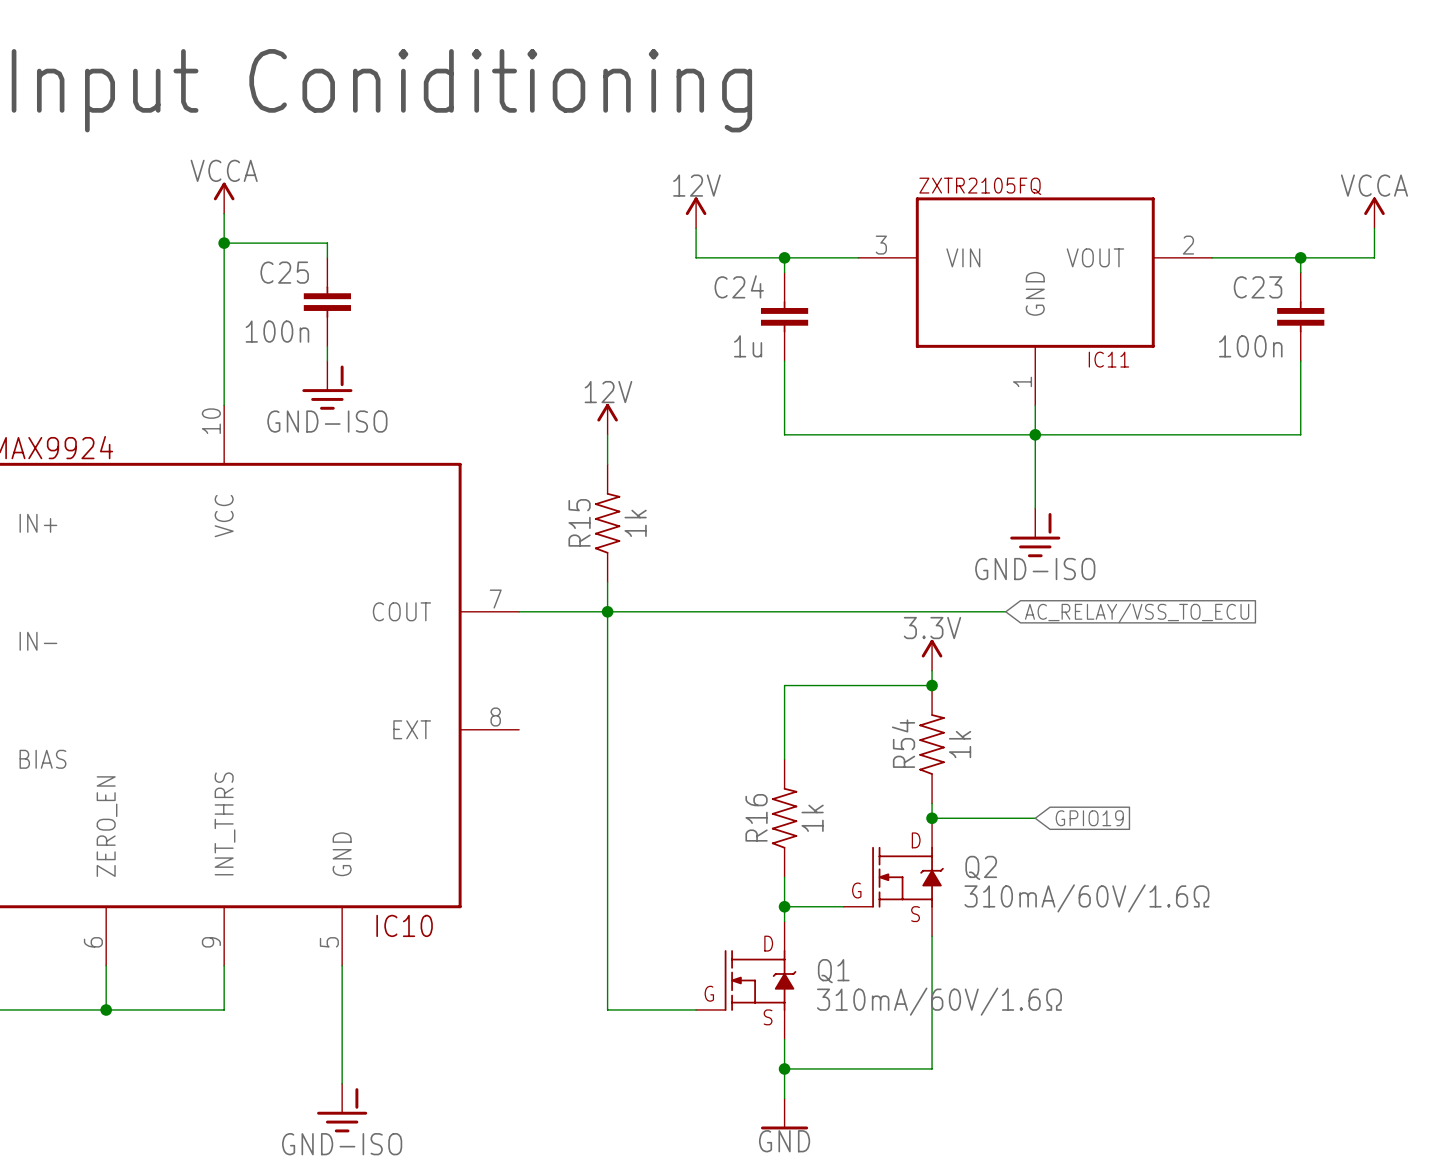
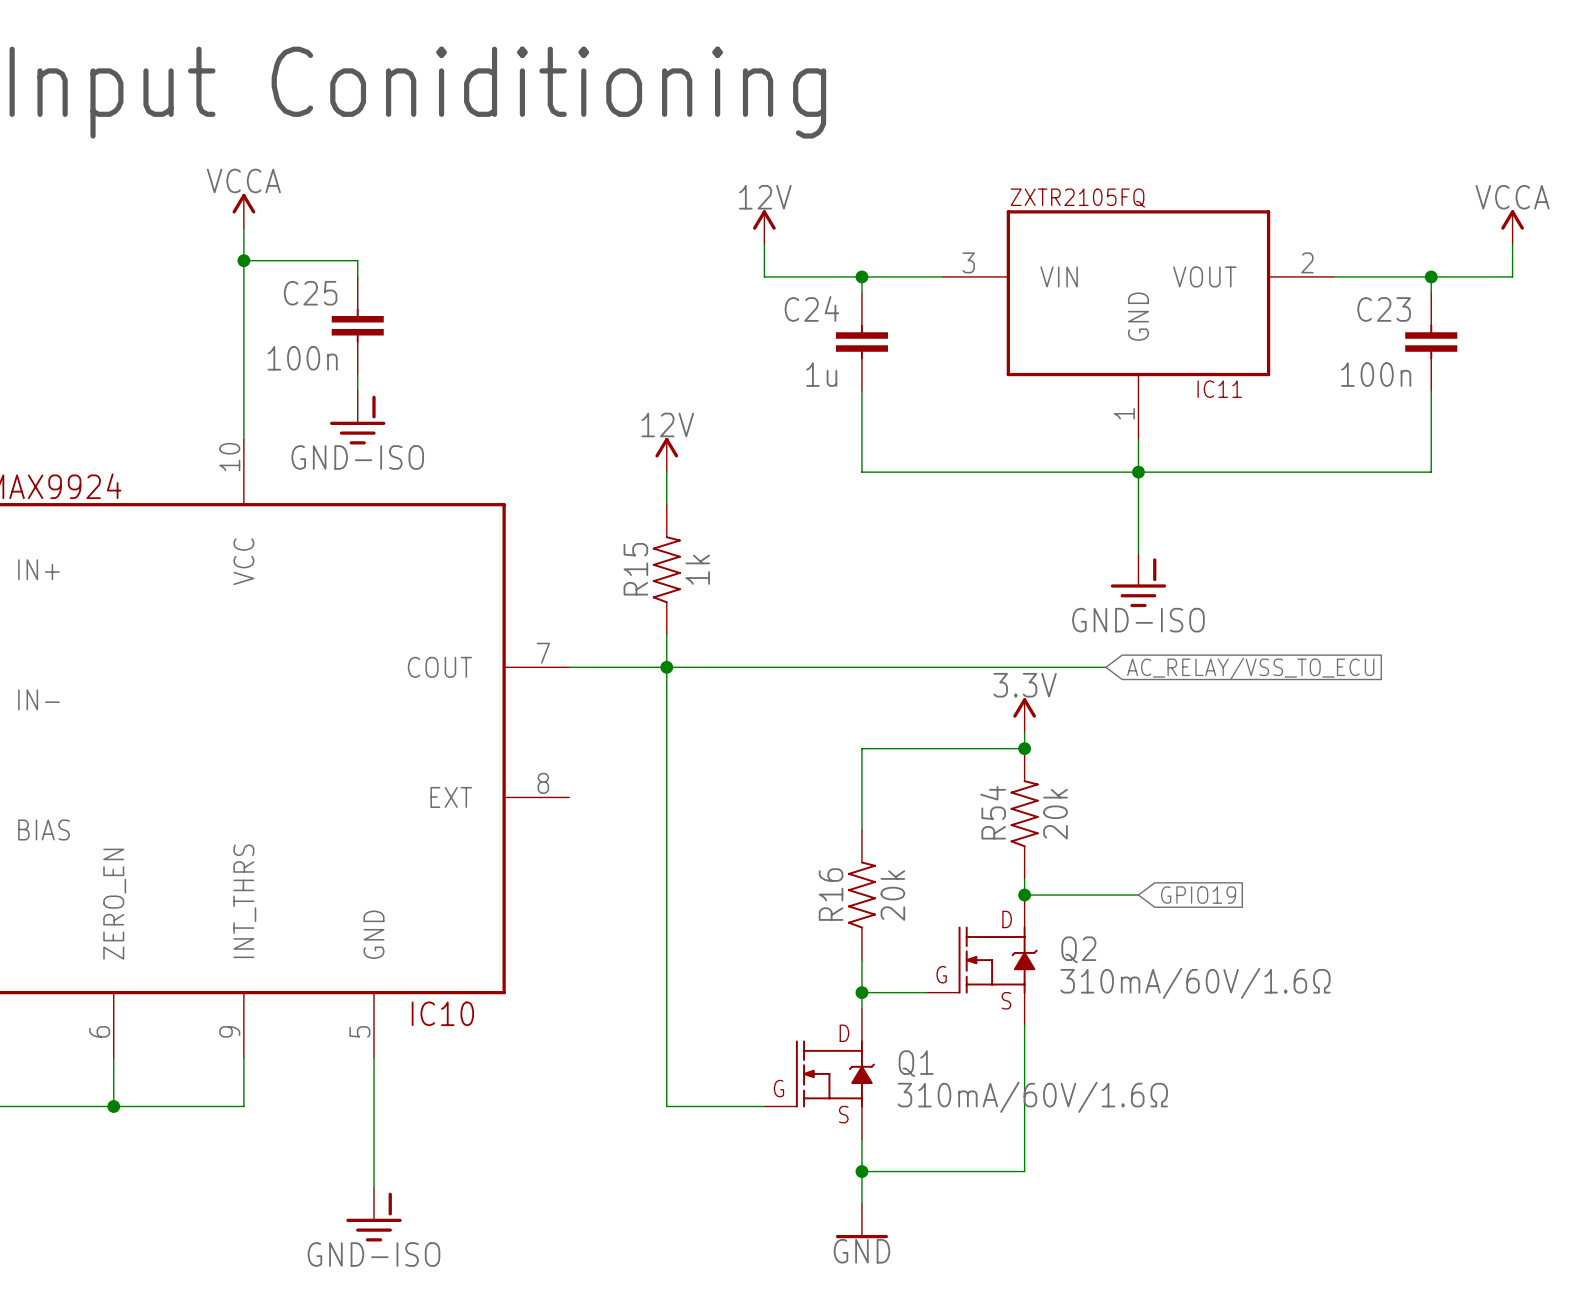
R54 value: 1k (960, 744) -> 20k (1055, 814)
R16 value: 1k (812, 818) -> 20k (892, 895)

